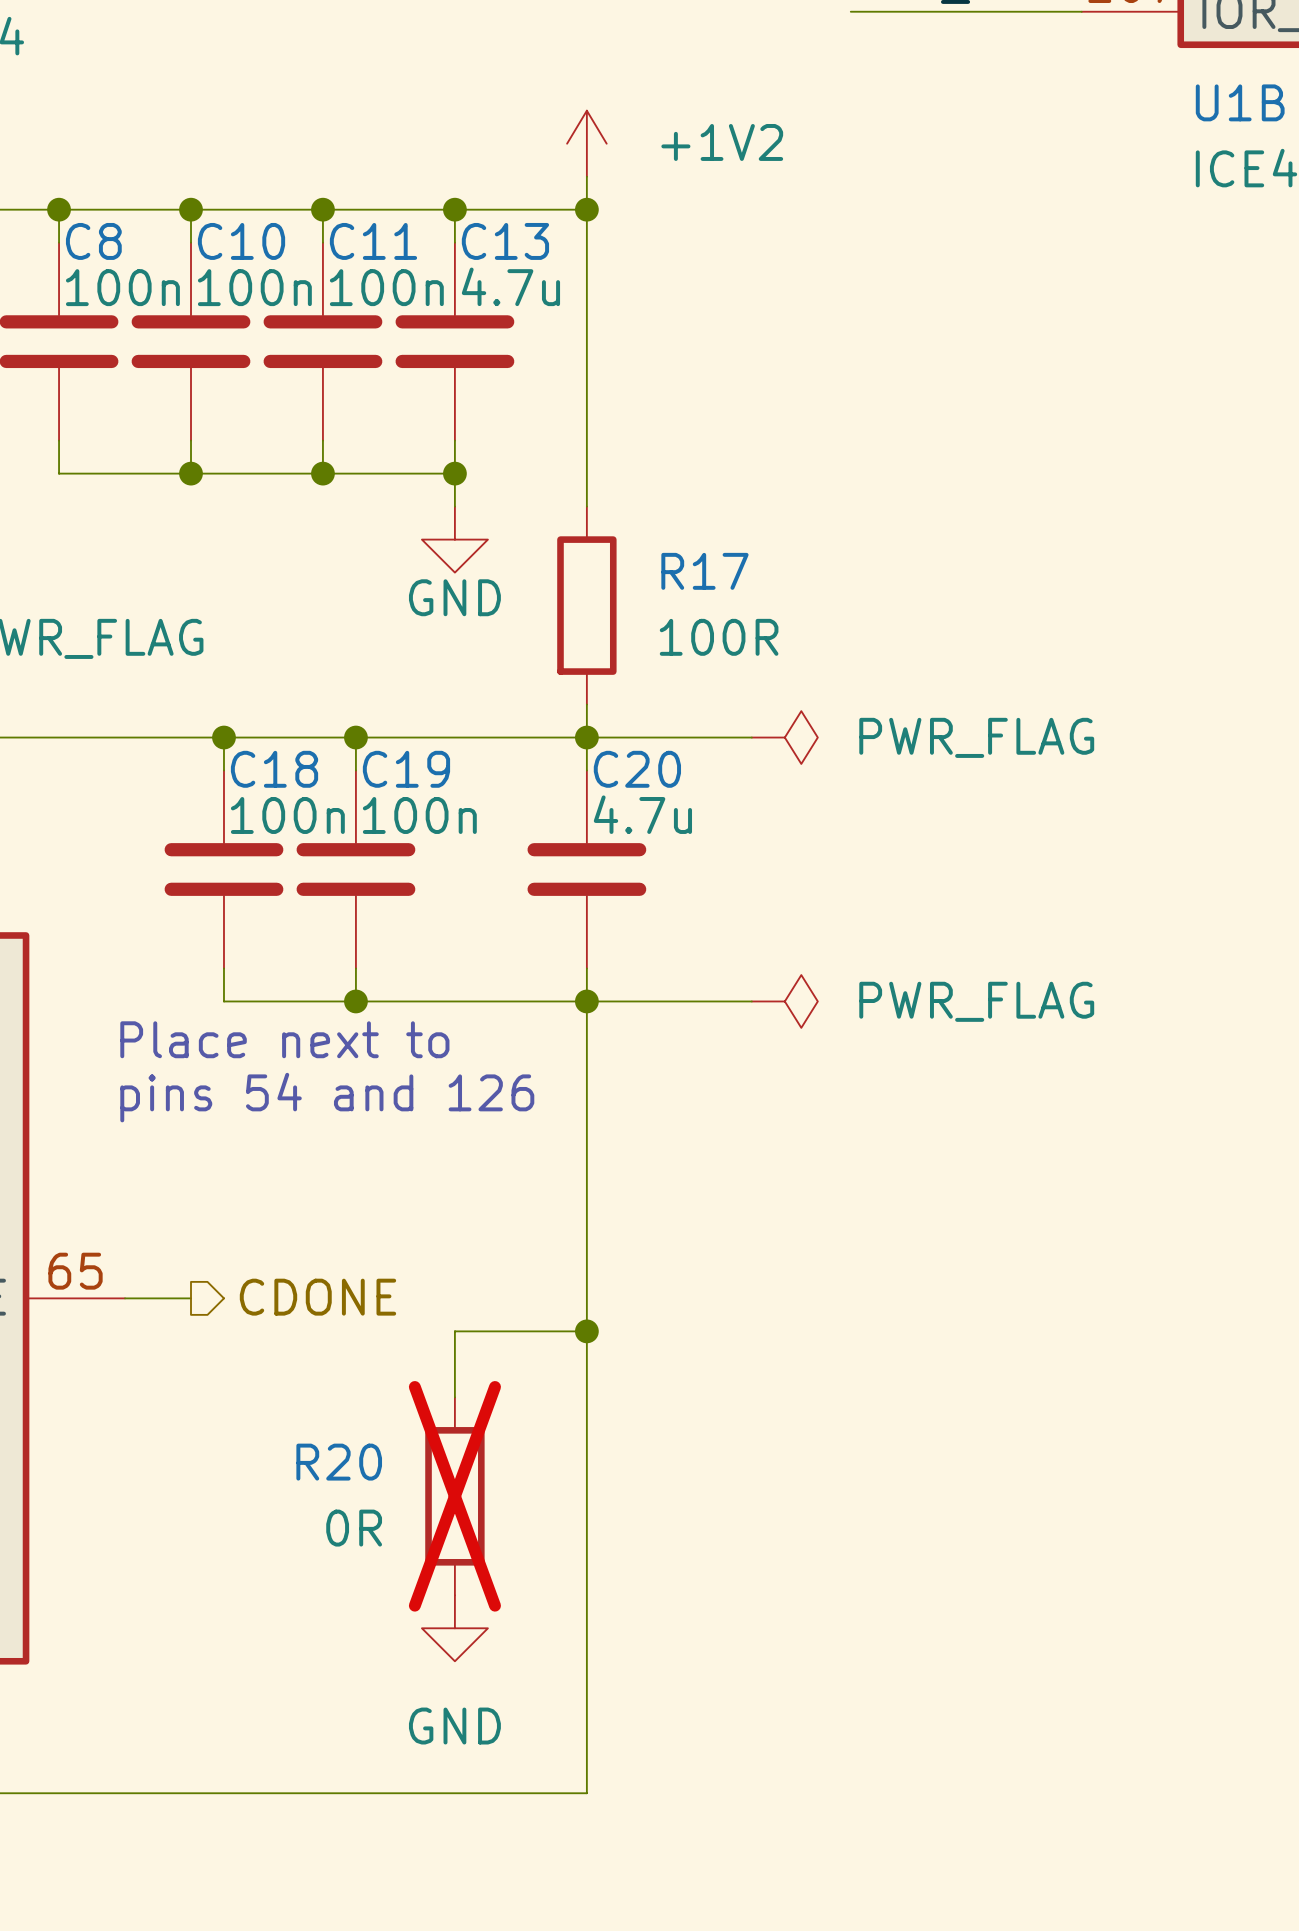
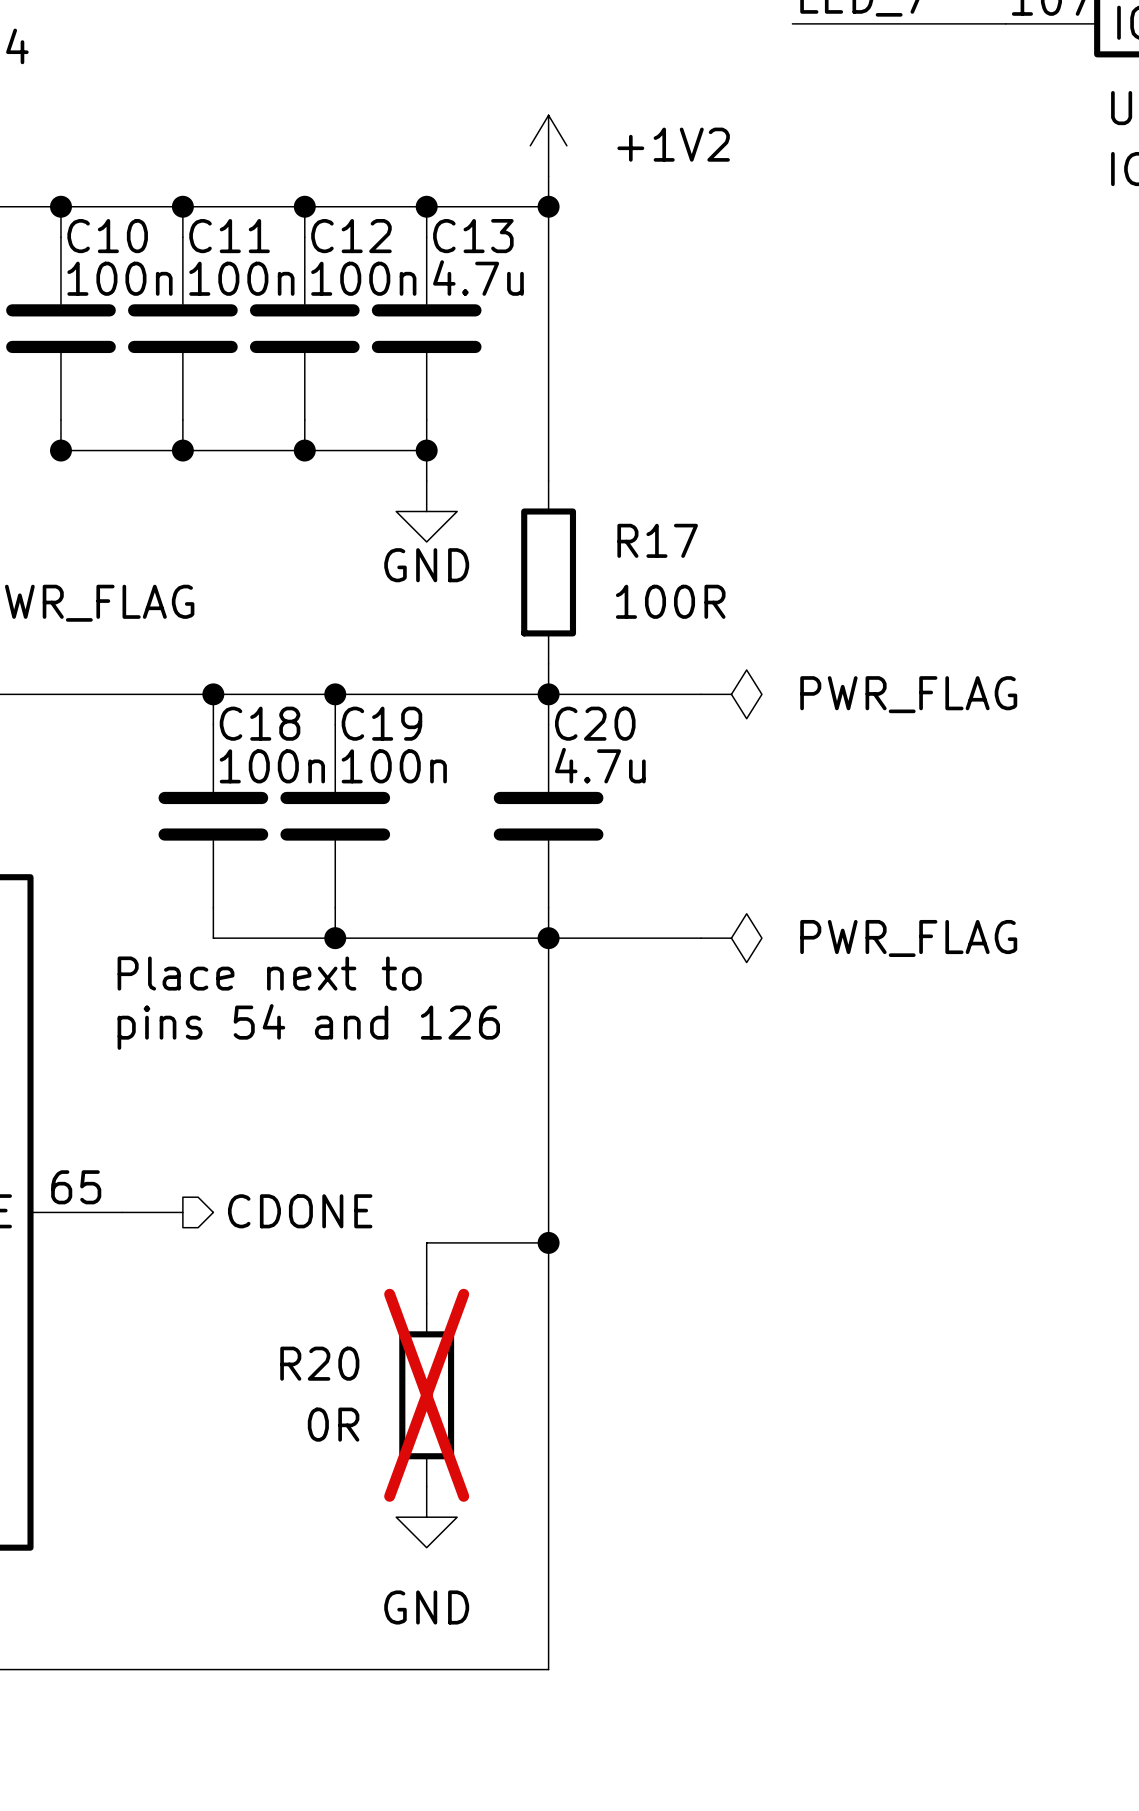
C8 name: C8 (93, 241) -> C10 (107, 236)
C10 name: C10 (241, 241) -> C11 (229, 236)
C11 name: C11 (373, 241) -> C12 (351, 236)
junction: none -> (60, 450)

